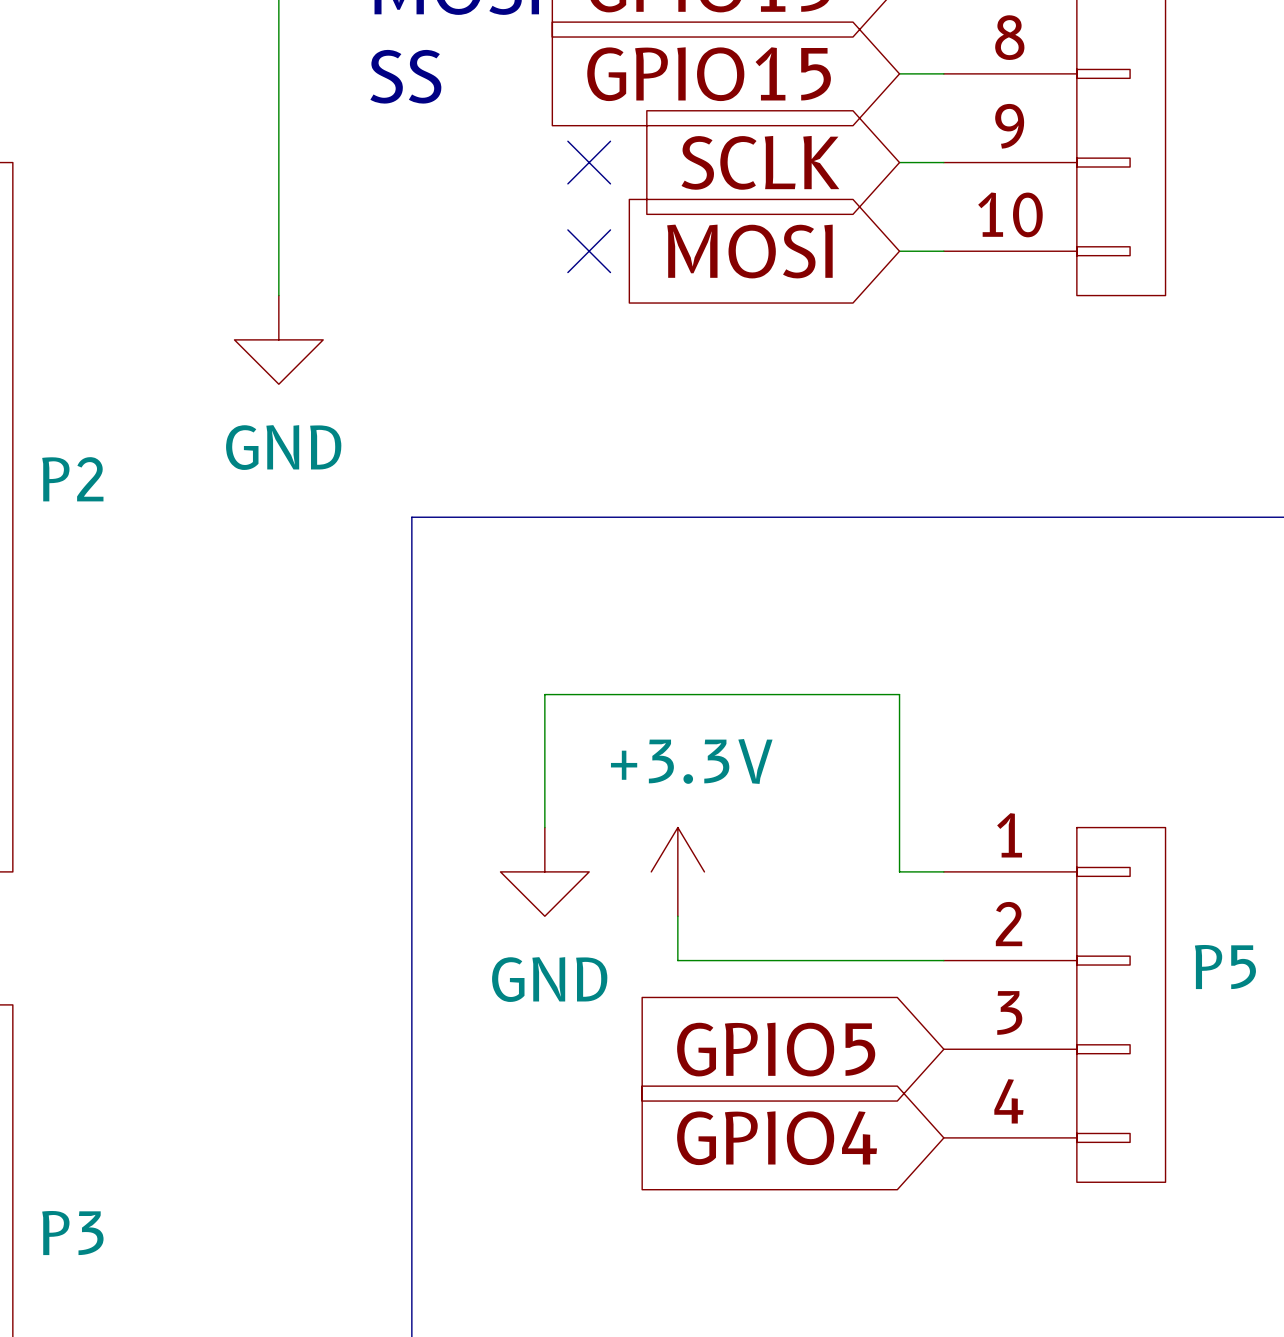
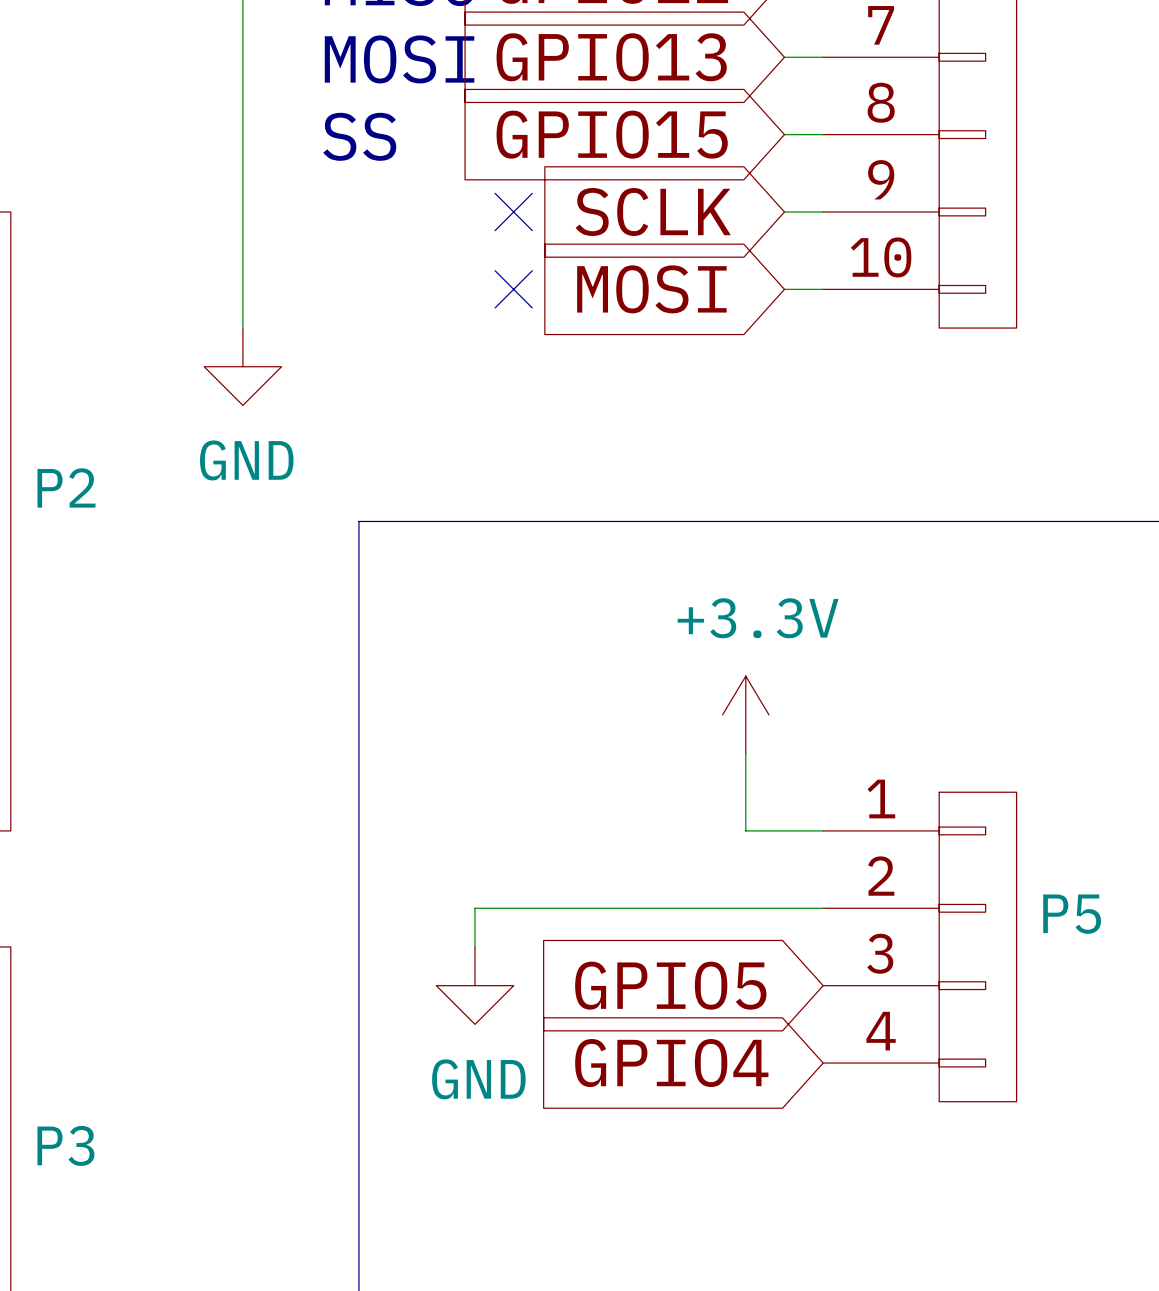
wire: (544, 827) (544, 694) (899, 694) (899, 871) -> (745, 753) (745, 830) (784, 830)
power symbol position: GND (544, 871) -> GND (475, 985)
power symbol position: +3.3V (677, 871) -> +3.3V (745, 714)
wire: (677, 916) (677, 960) -> (475, 946) (475, 908) (591, 908)

